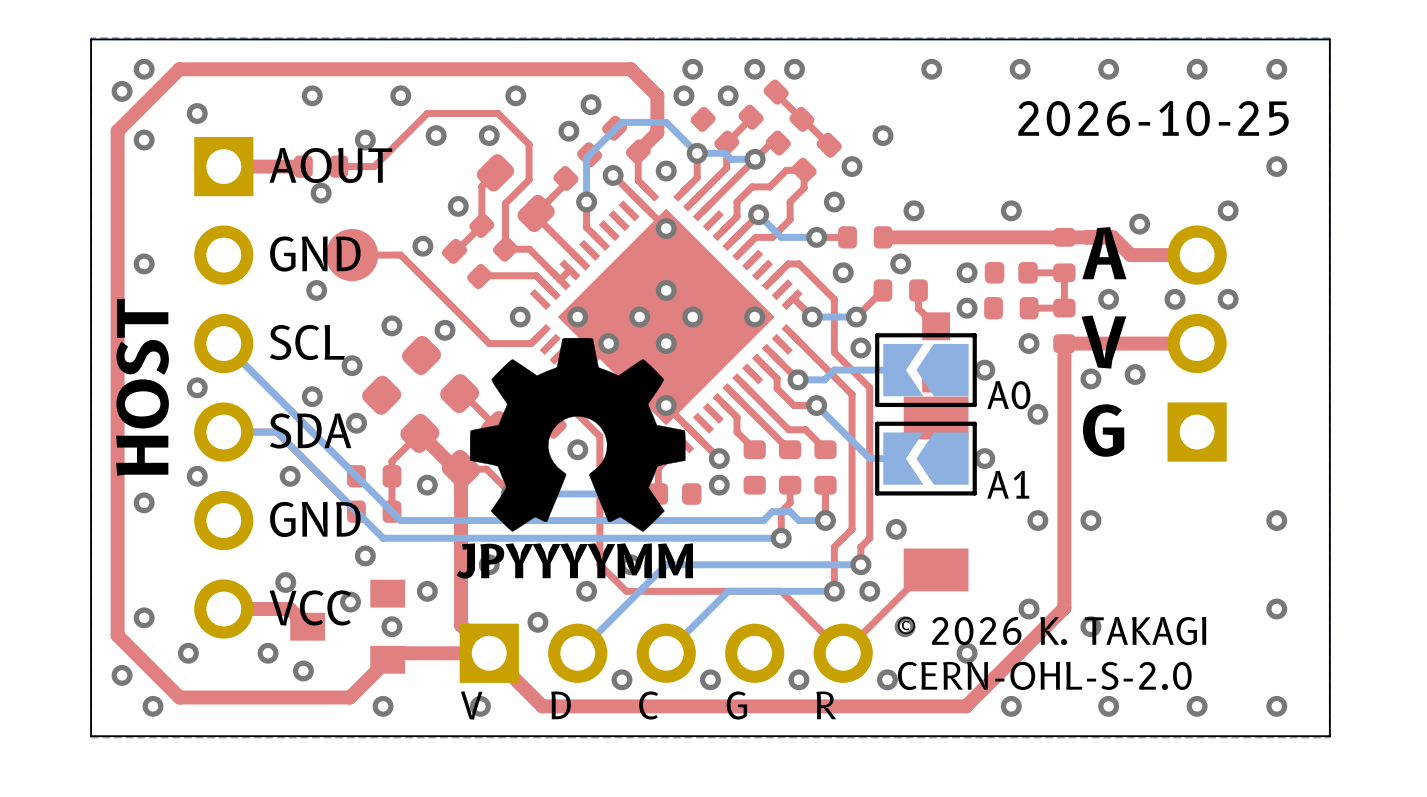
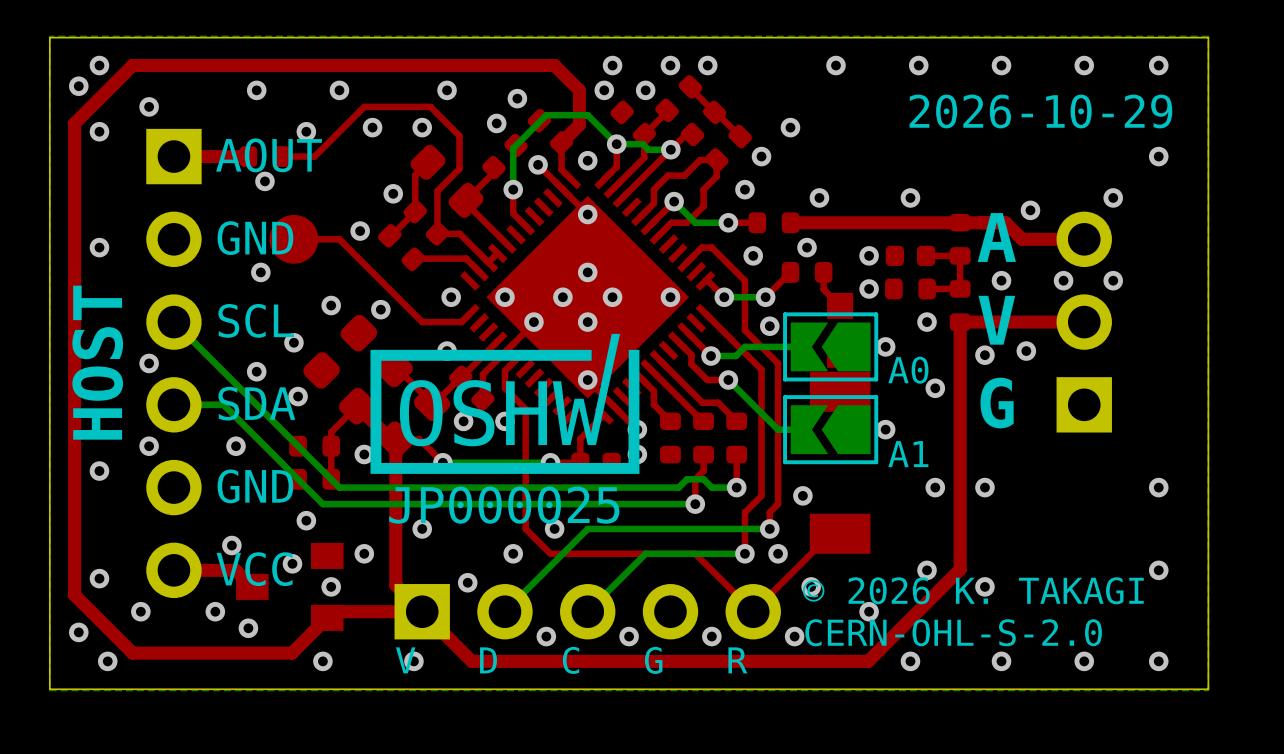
text: 2026-10-25 (1153, 118) -> 2026-10-29 (1040, 111)
drawing shape: [470, 337, 686, 532] -> [370, 333, 640, 524]
text: JPYYYYMM (574, 561) -> none

